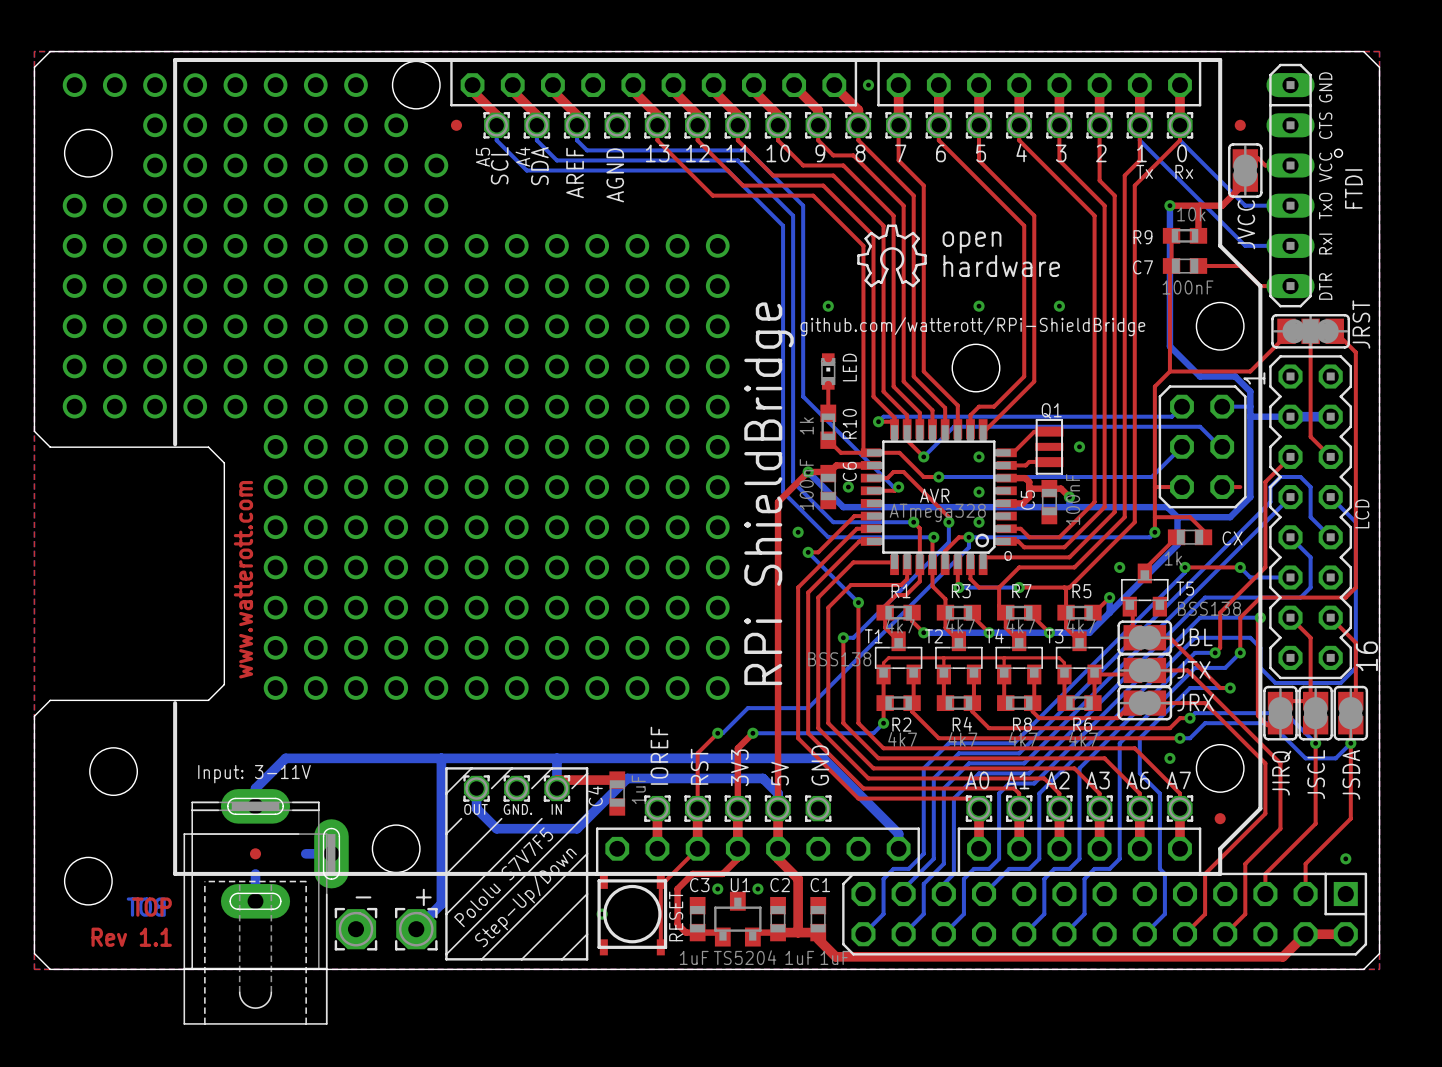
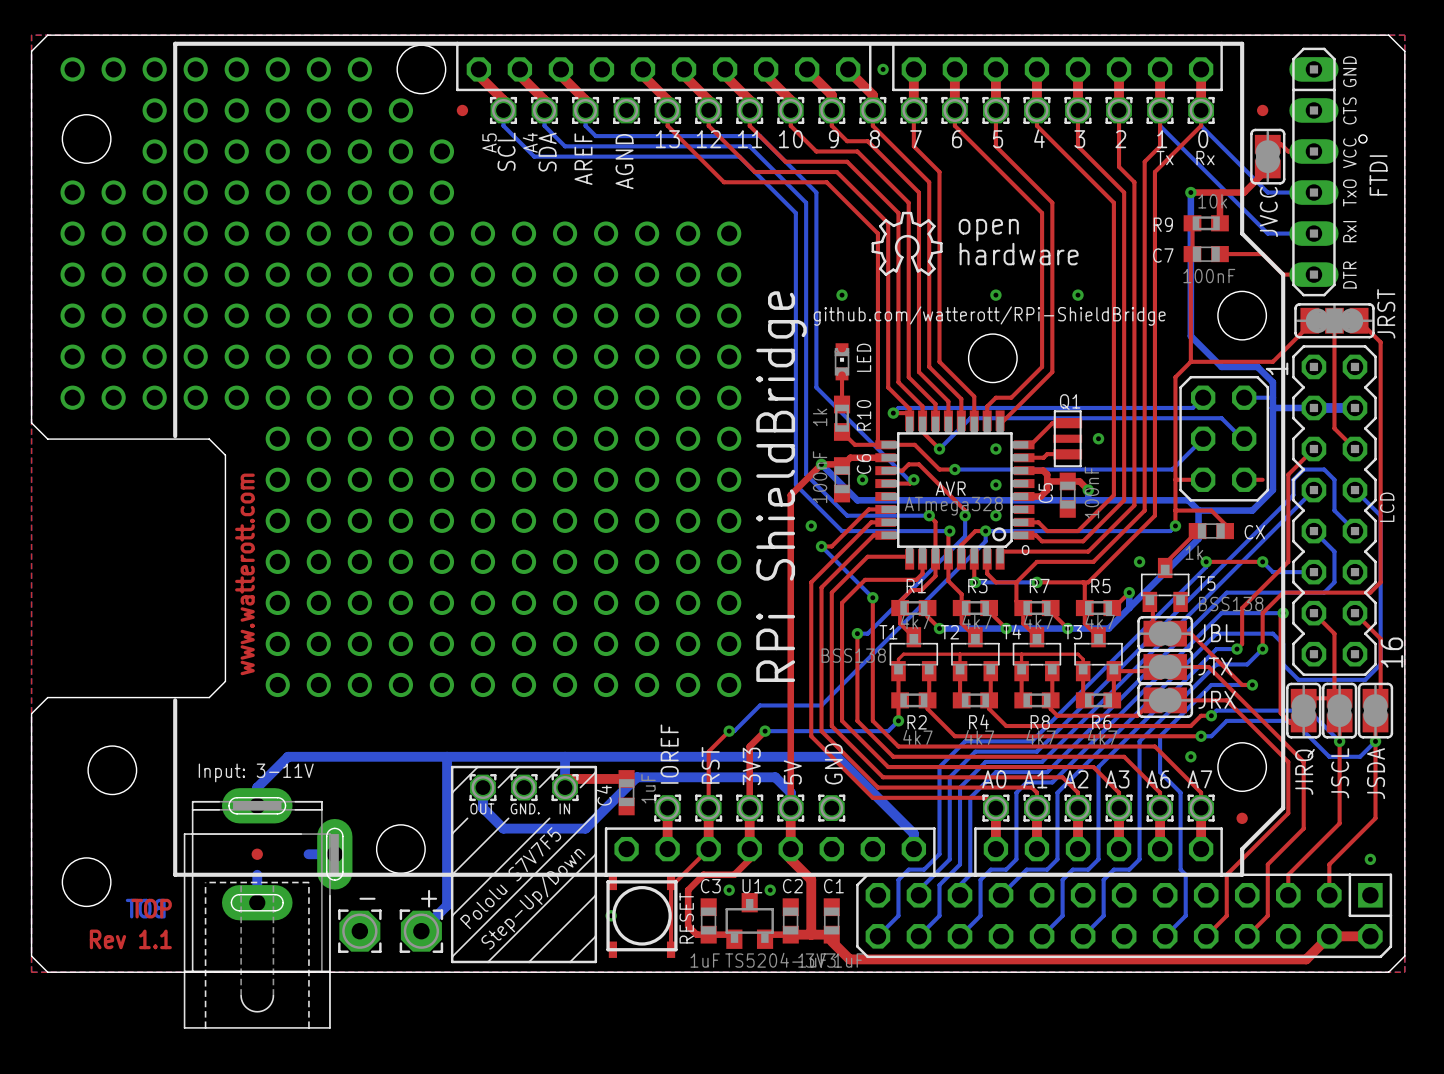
U1 value: TS5204 (745, 957) -> TS5204-3V3 (780, 960)

